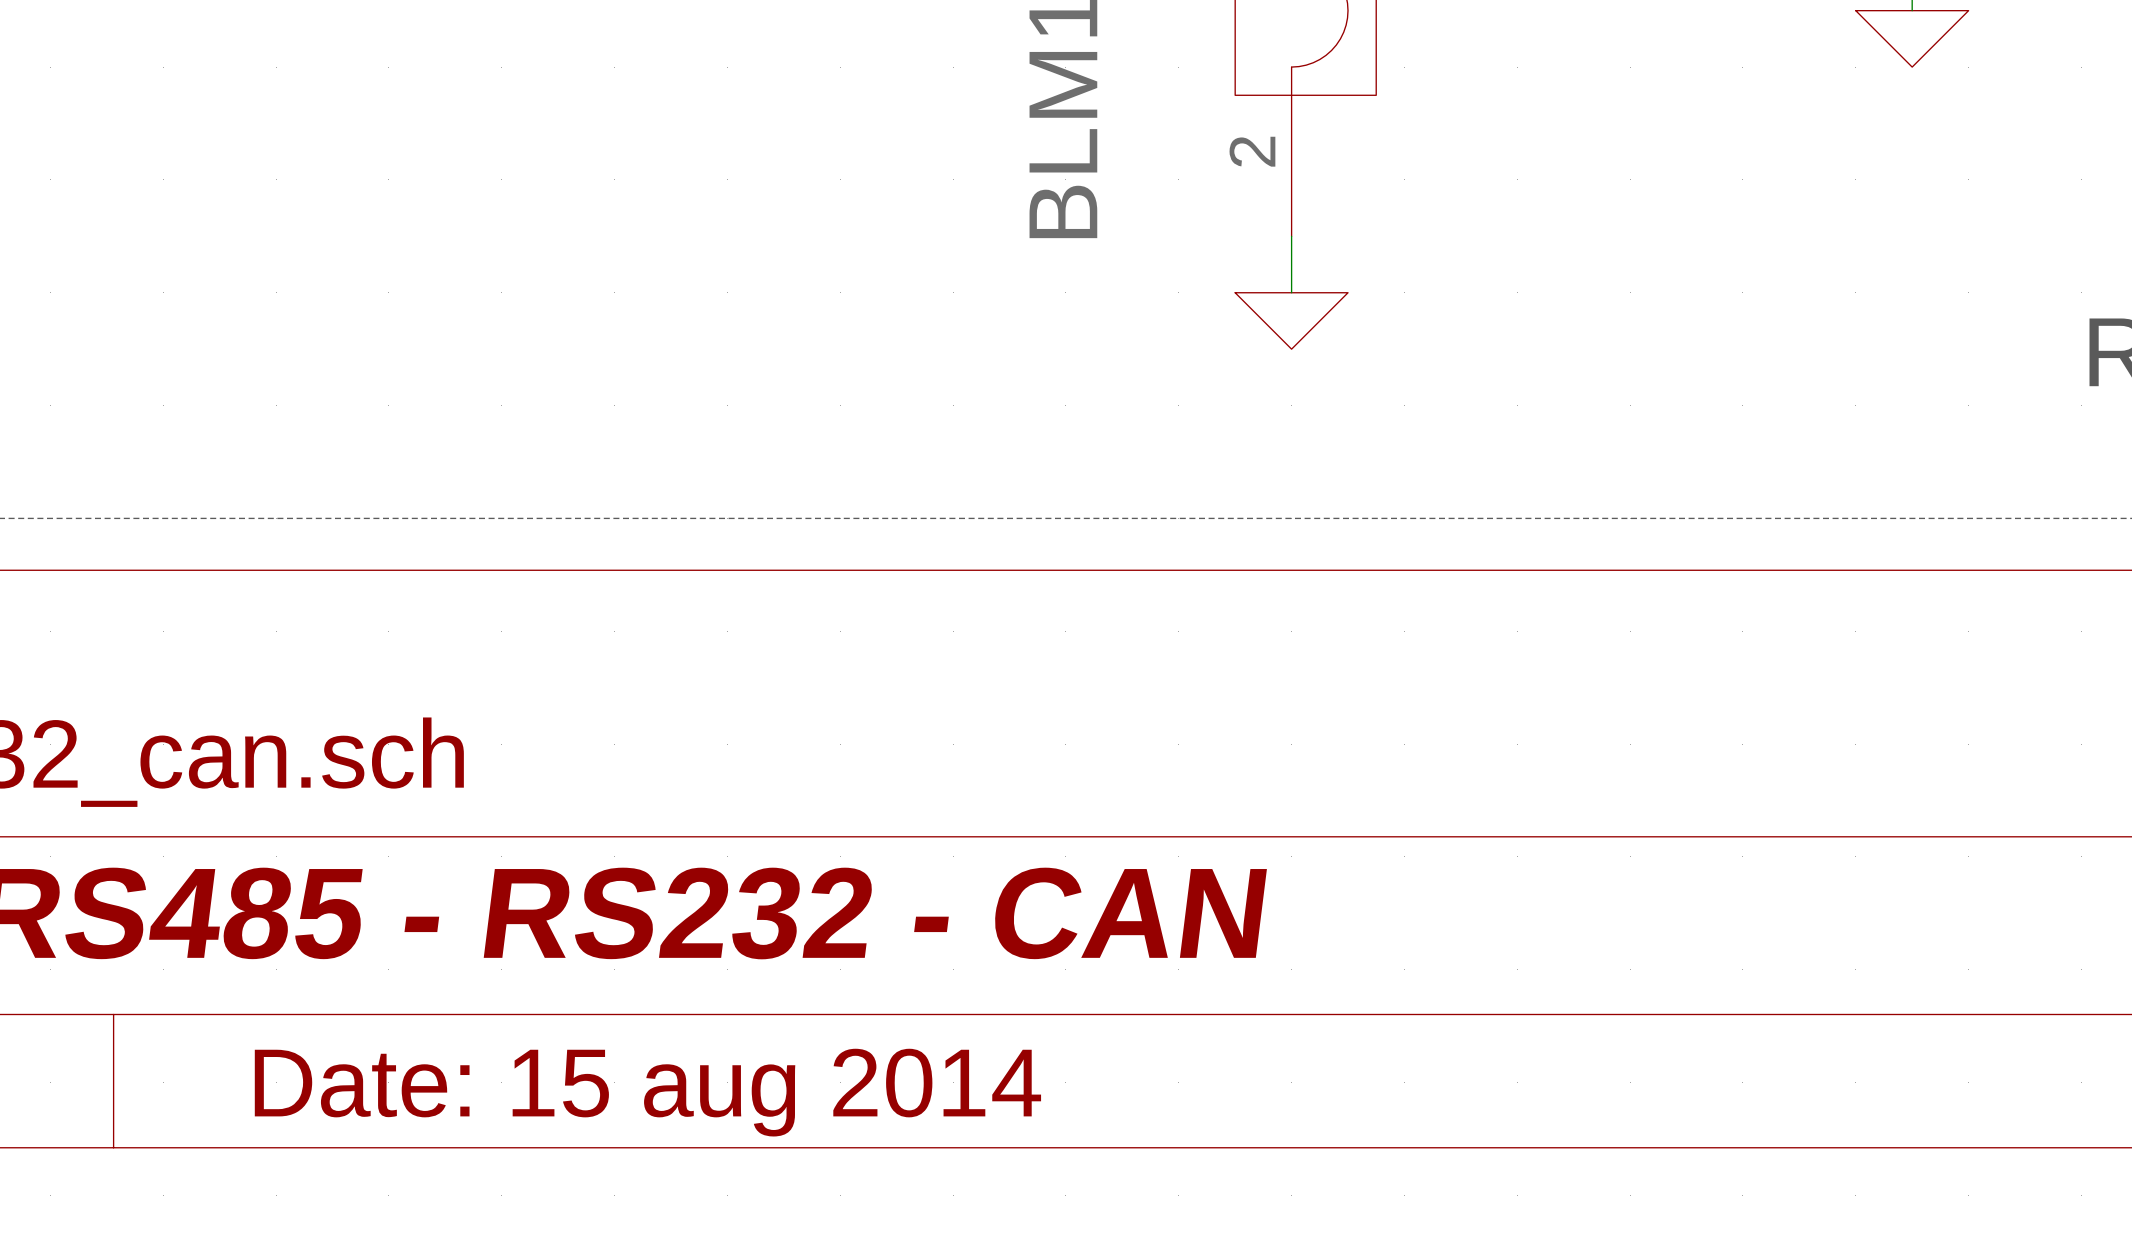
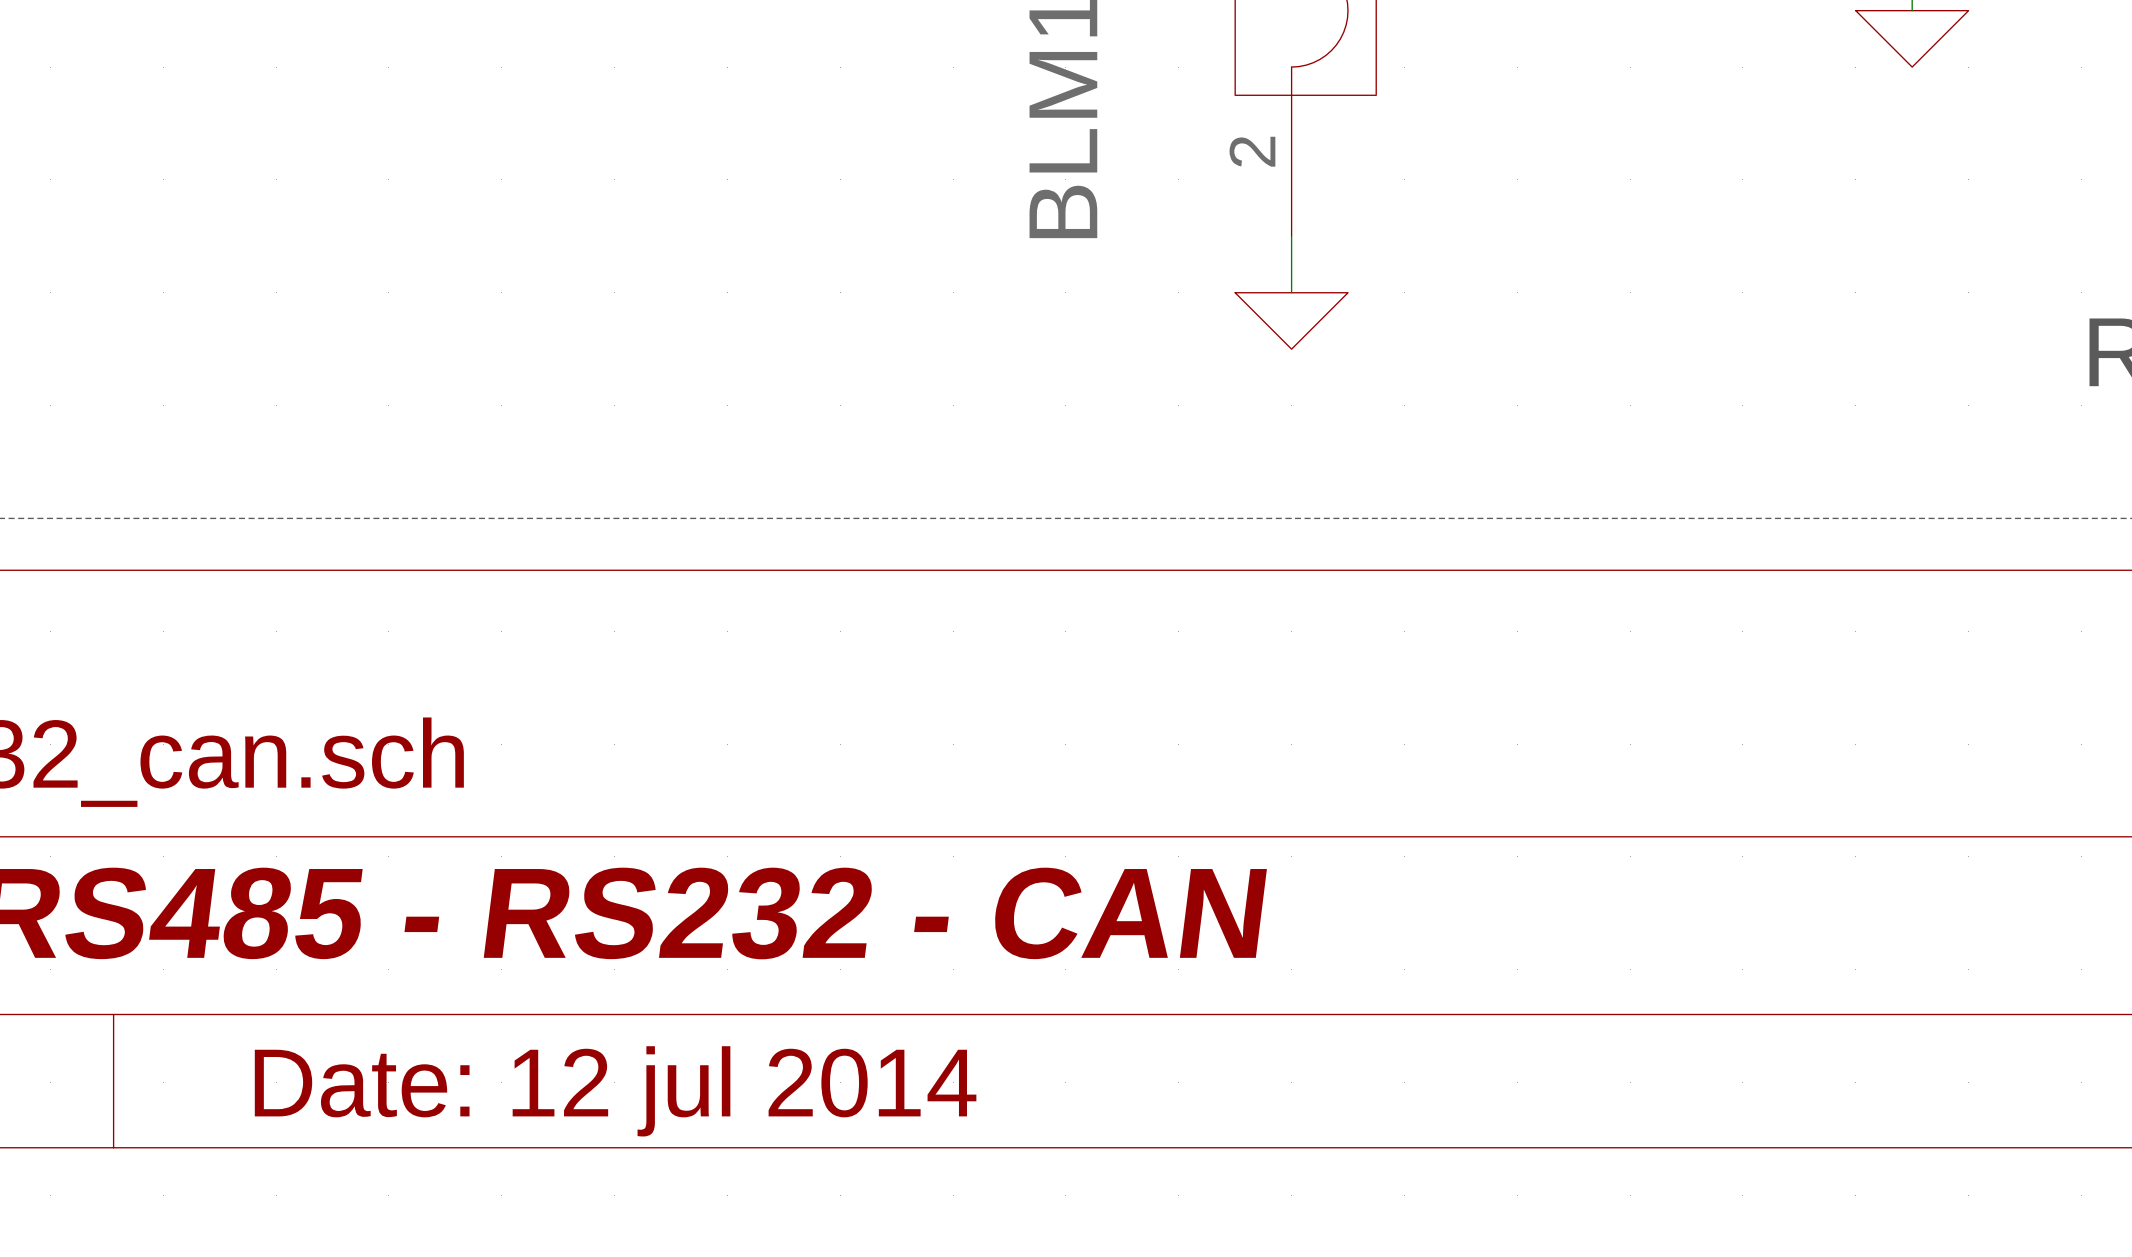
title block: Date: 15 aug 2014 (647, 1092) -> Date: 12 jul 2014 (615, 1091)

